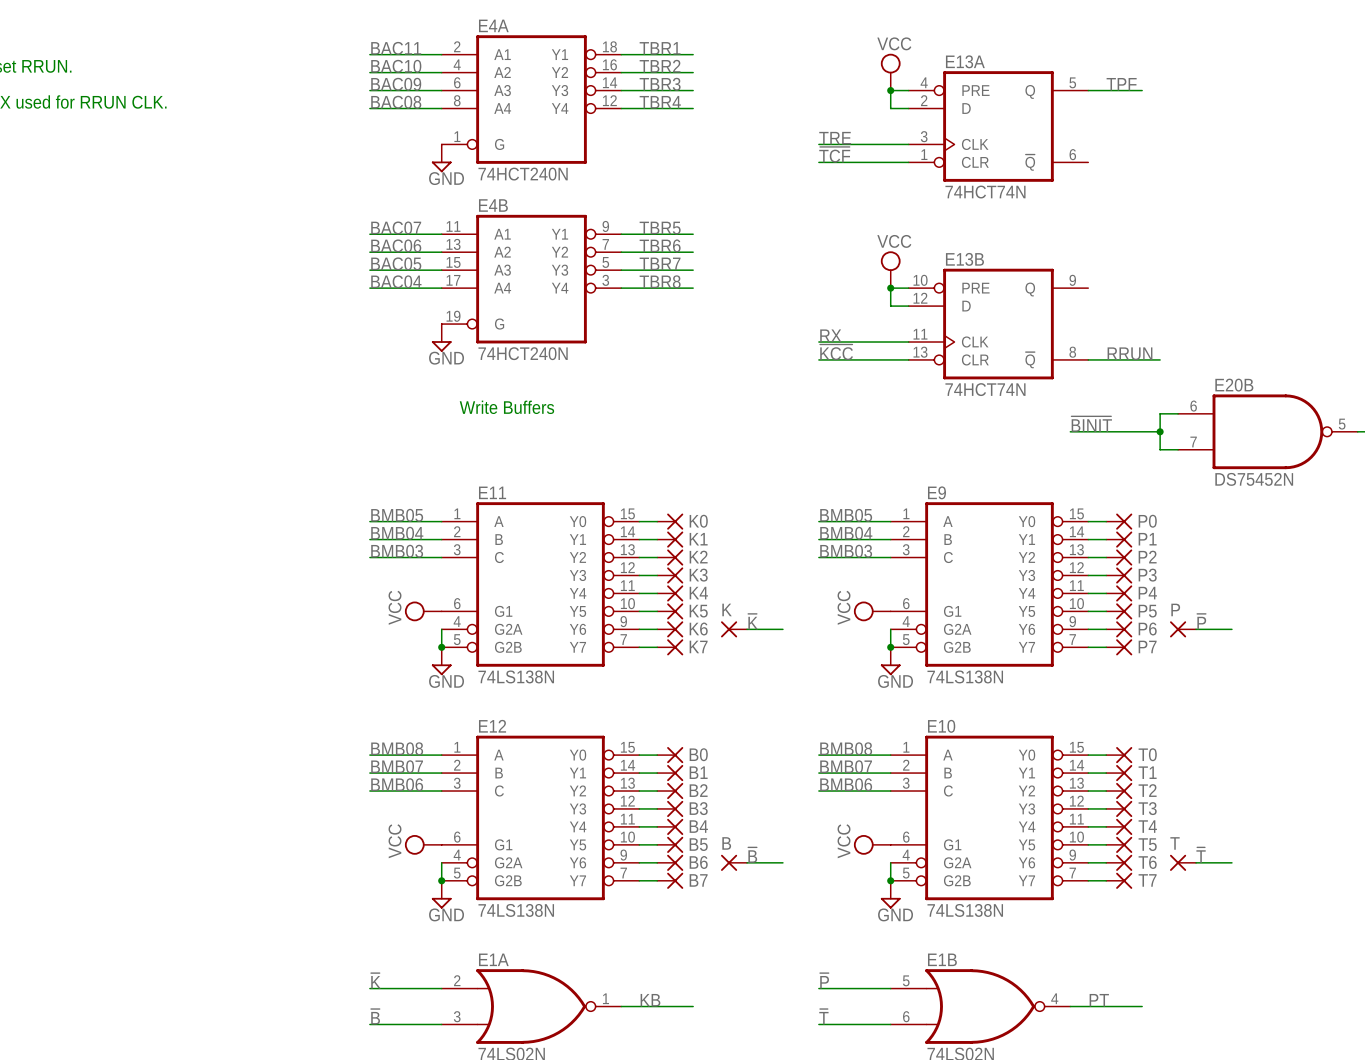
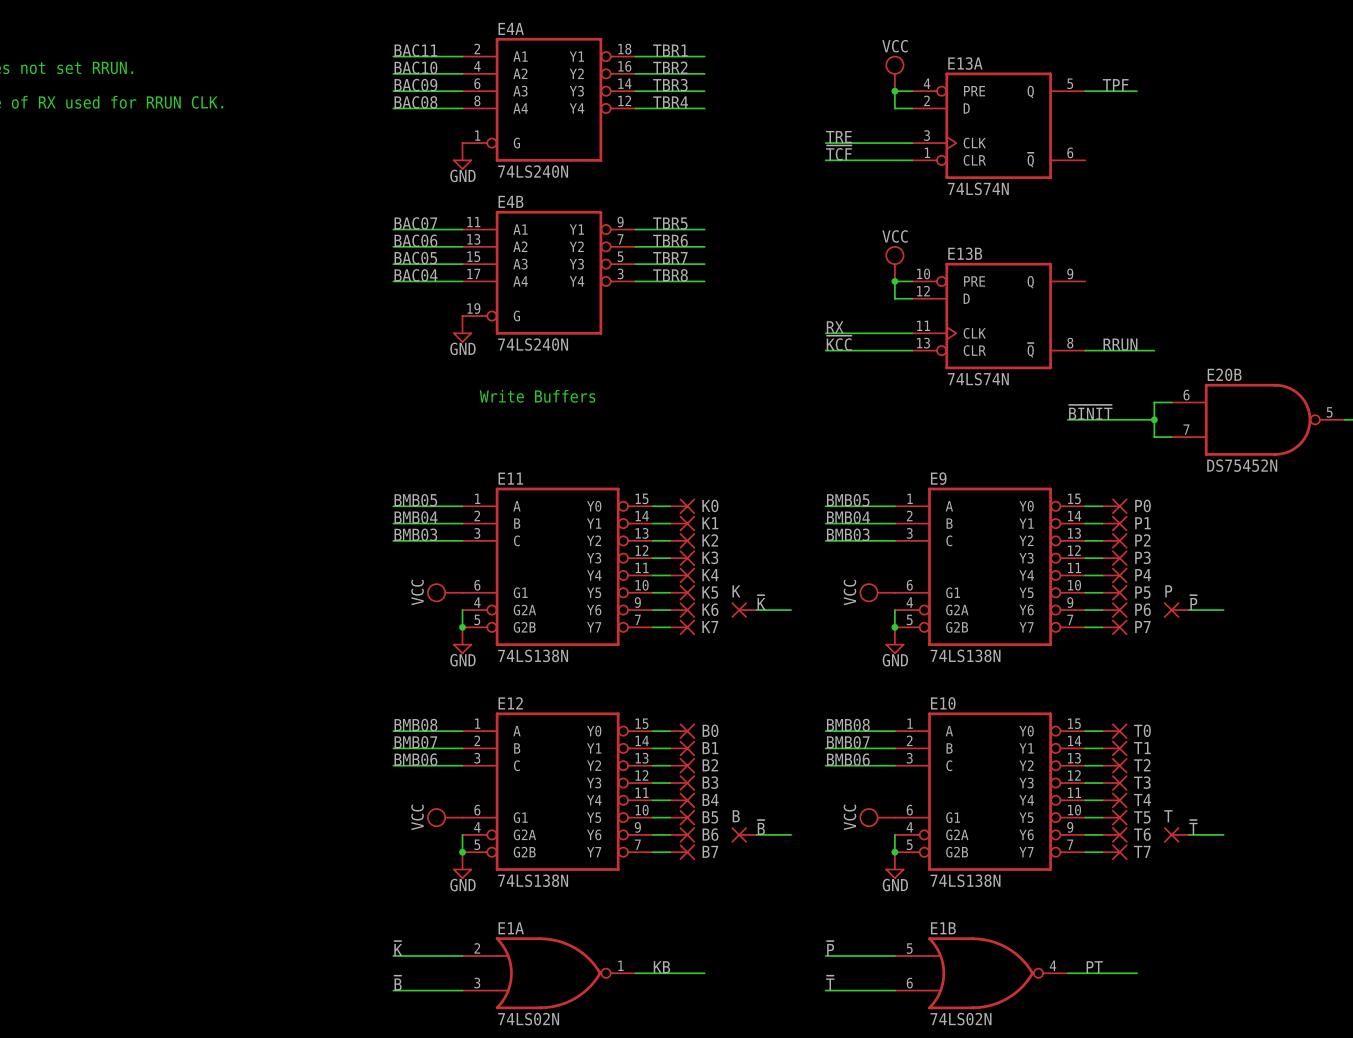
E4A value: 74HCT240N (523, 174) -> 74LS240N (533, 171)
E13A value: 74HCT74N (985, 192) -> 74LS74N (978, 188)
E4B value: 74HCT240N (523, 353) -> 74LS240N (533, 344)
E13B value: 74HCT74N (985, 389) -> 74LS74N (978, 379)

